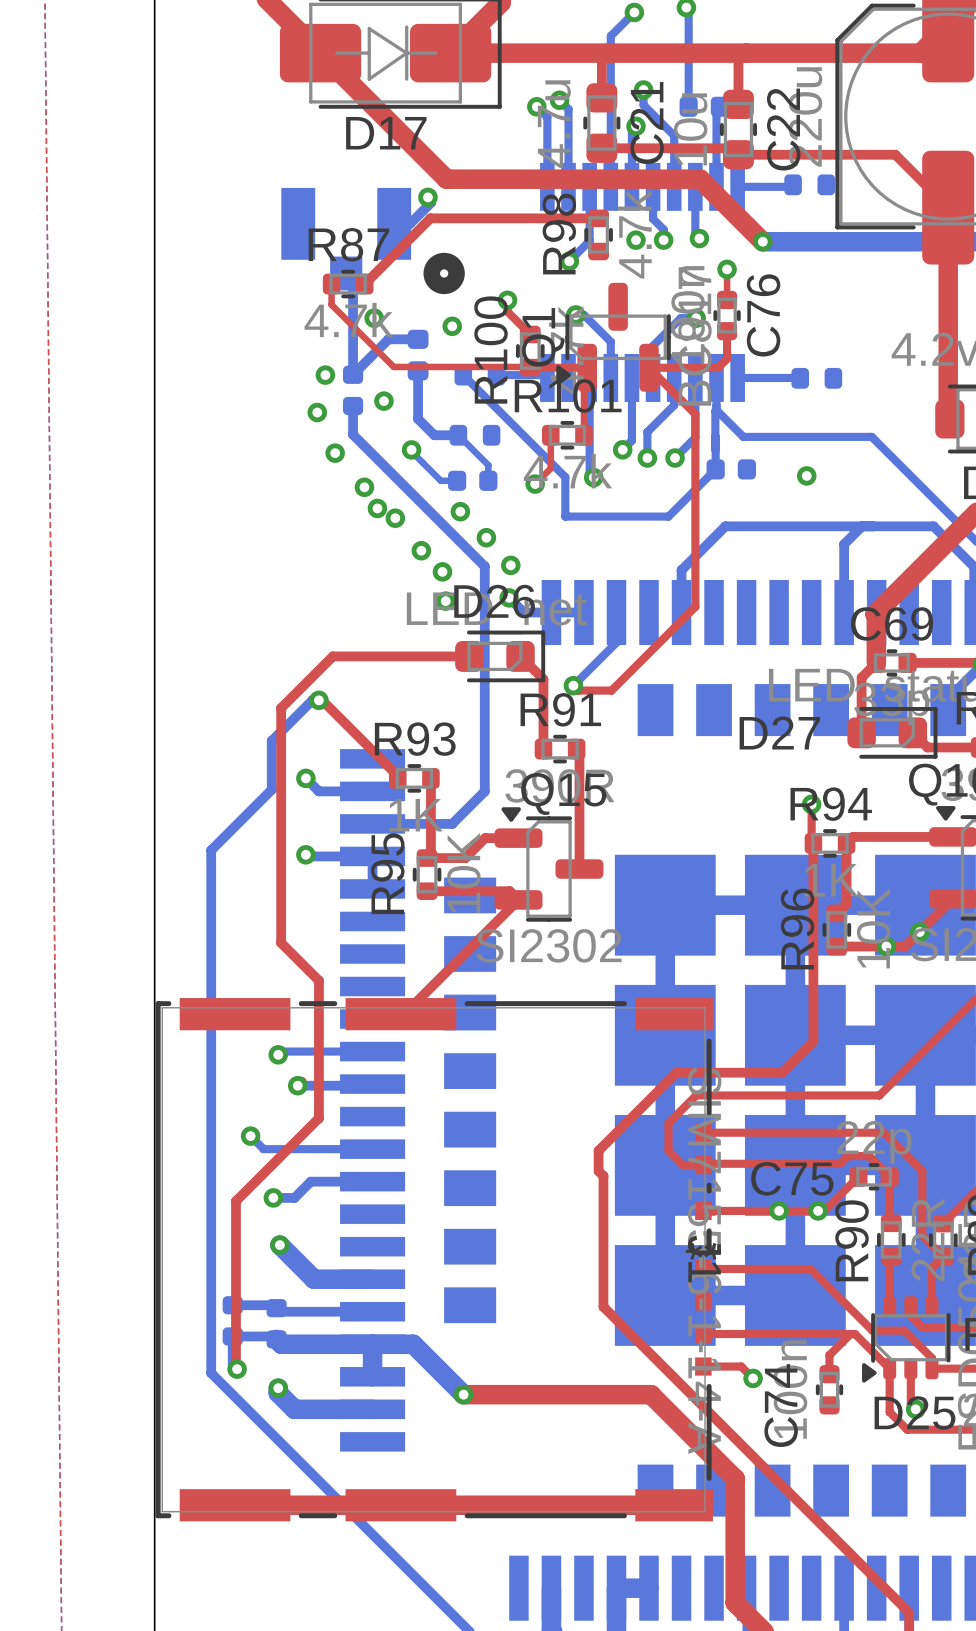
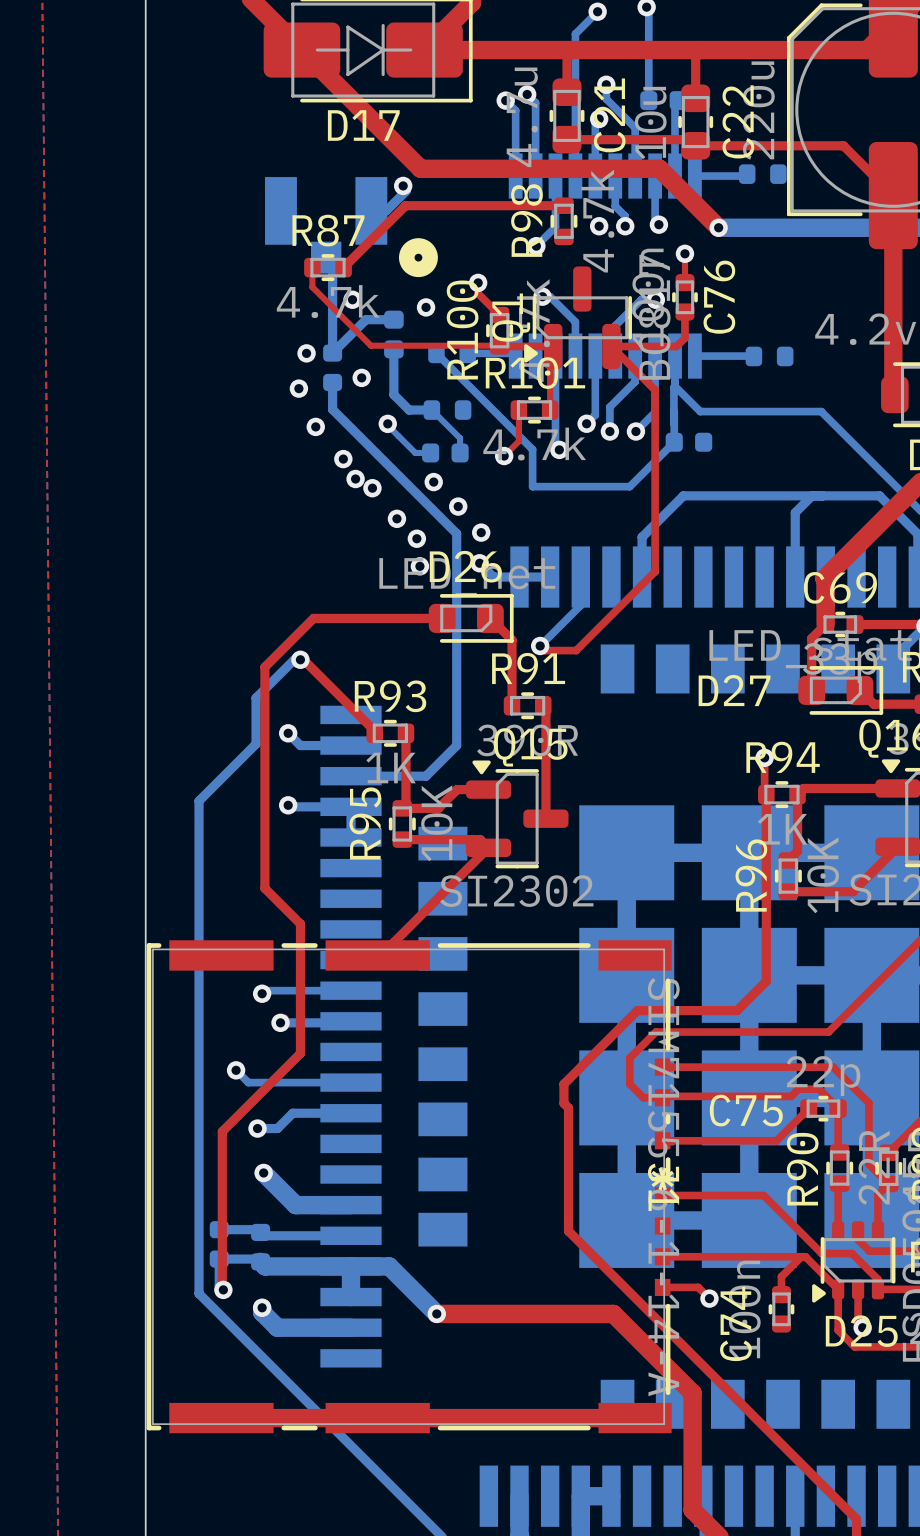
via: (806, 475) -> none
via: (919, 932) -> none
via: (886, 946) -> none
via: (779, 1210) -> none
via: (818, 1210) -> none

